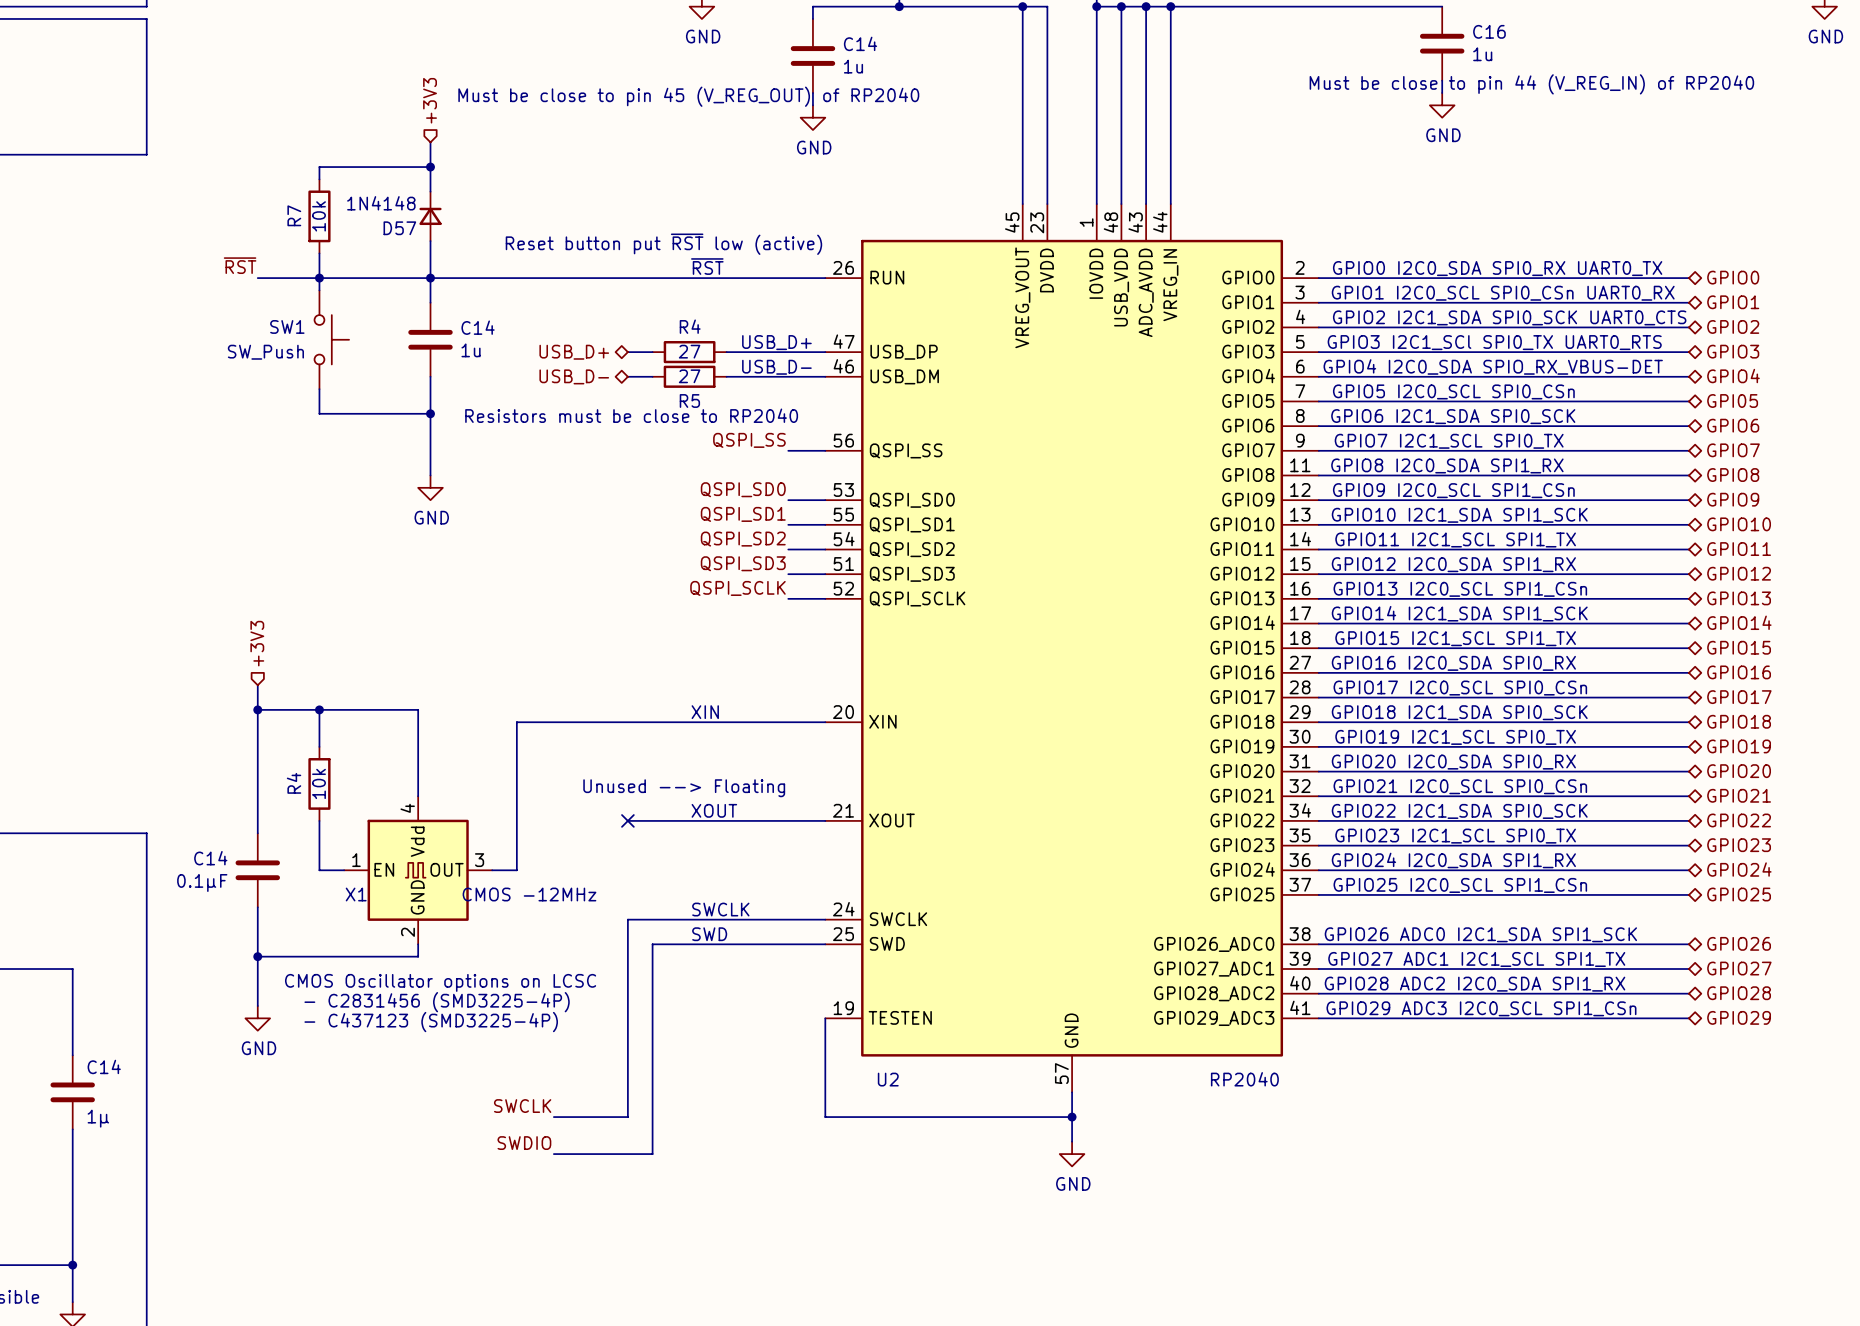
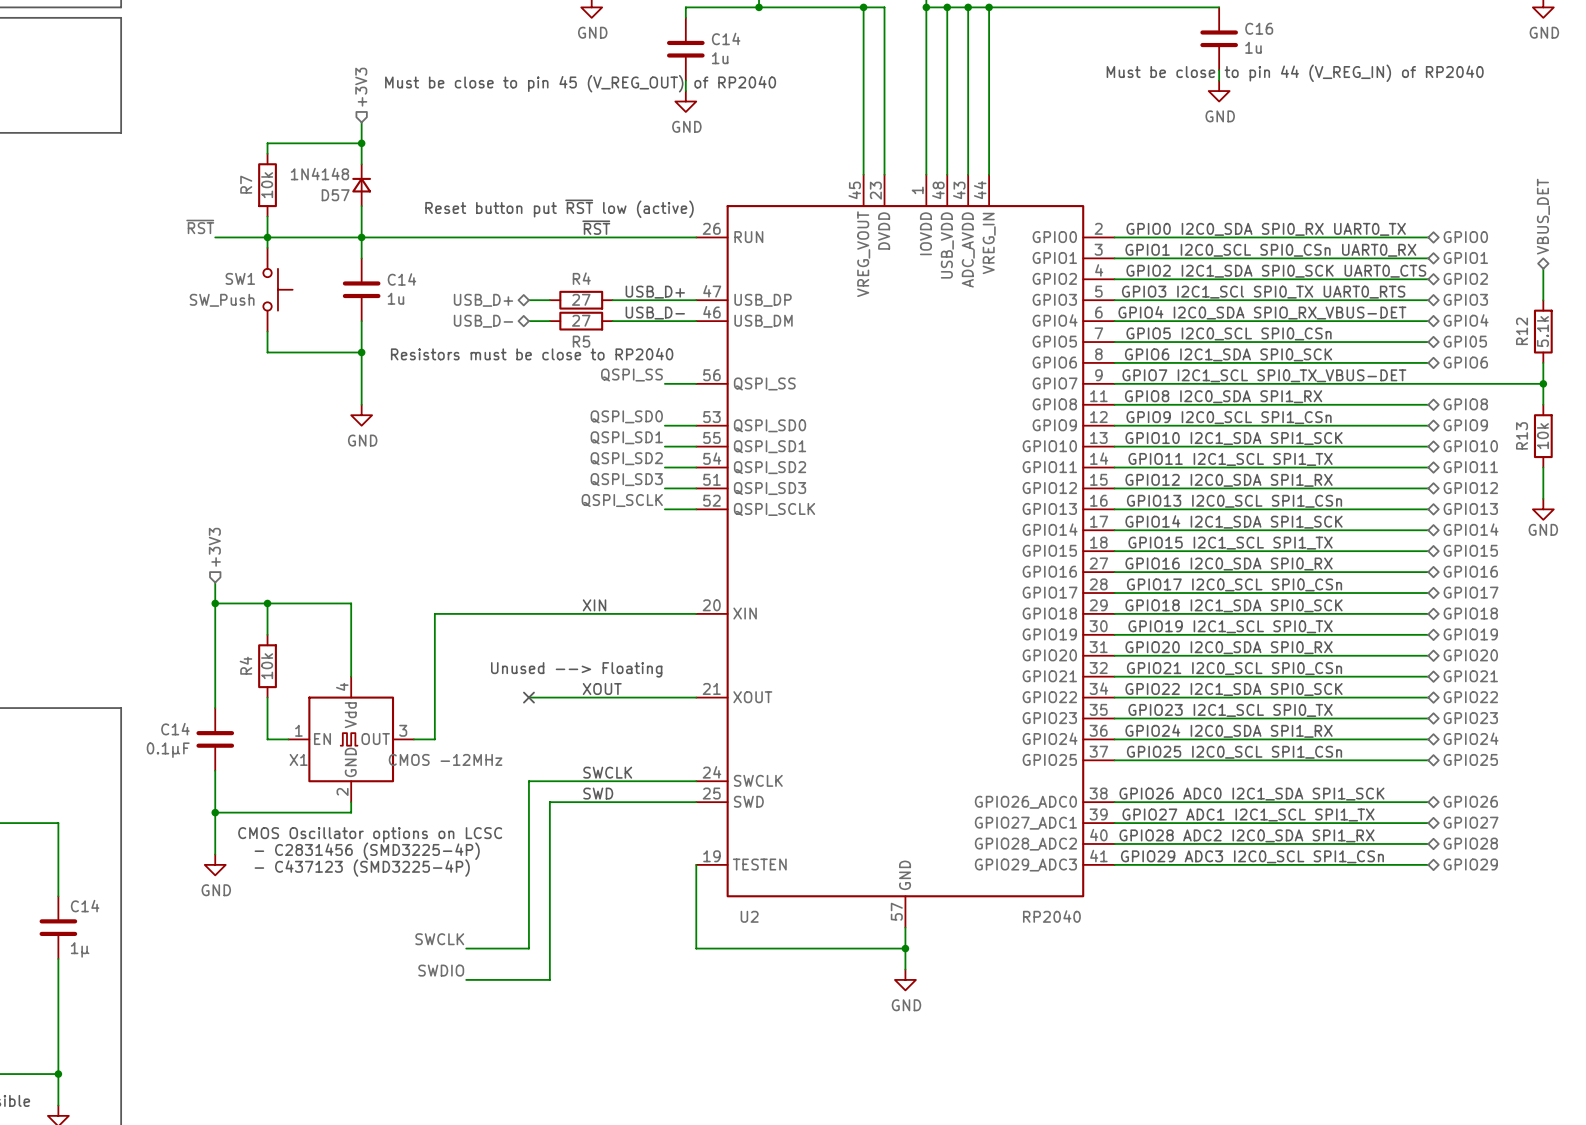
hierarchical label: none -> VBUS_DET (1543, 216)
wire: none -> (1543, 268) (1543, 300)
R12: none -> 5.1k (1543, 331)
wire: none -> (1543, 362) (1543, 404)
text: GPIO7 I2C1_SCL SPI0_TX (1449, 441) -> GPIO7 I2C1_SCL SPI0_TX_VBUS-DET (1264, 375)
wire: none -> (1428, 383) (1543, 383)
hierarchical label: GPIO7 (1733, 450) -> none
junction: none -> (1543, 383)
R13: none -> 10k (1543, 436)
wire: none -> (1543, 467) (1543, 498)
power symbol: none -> GND (1543, 509)

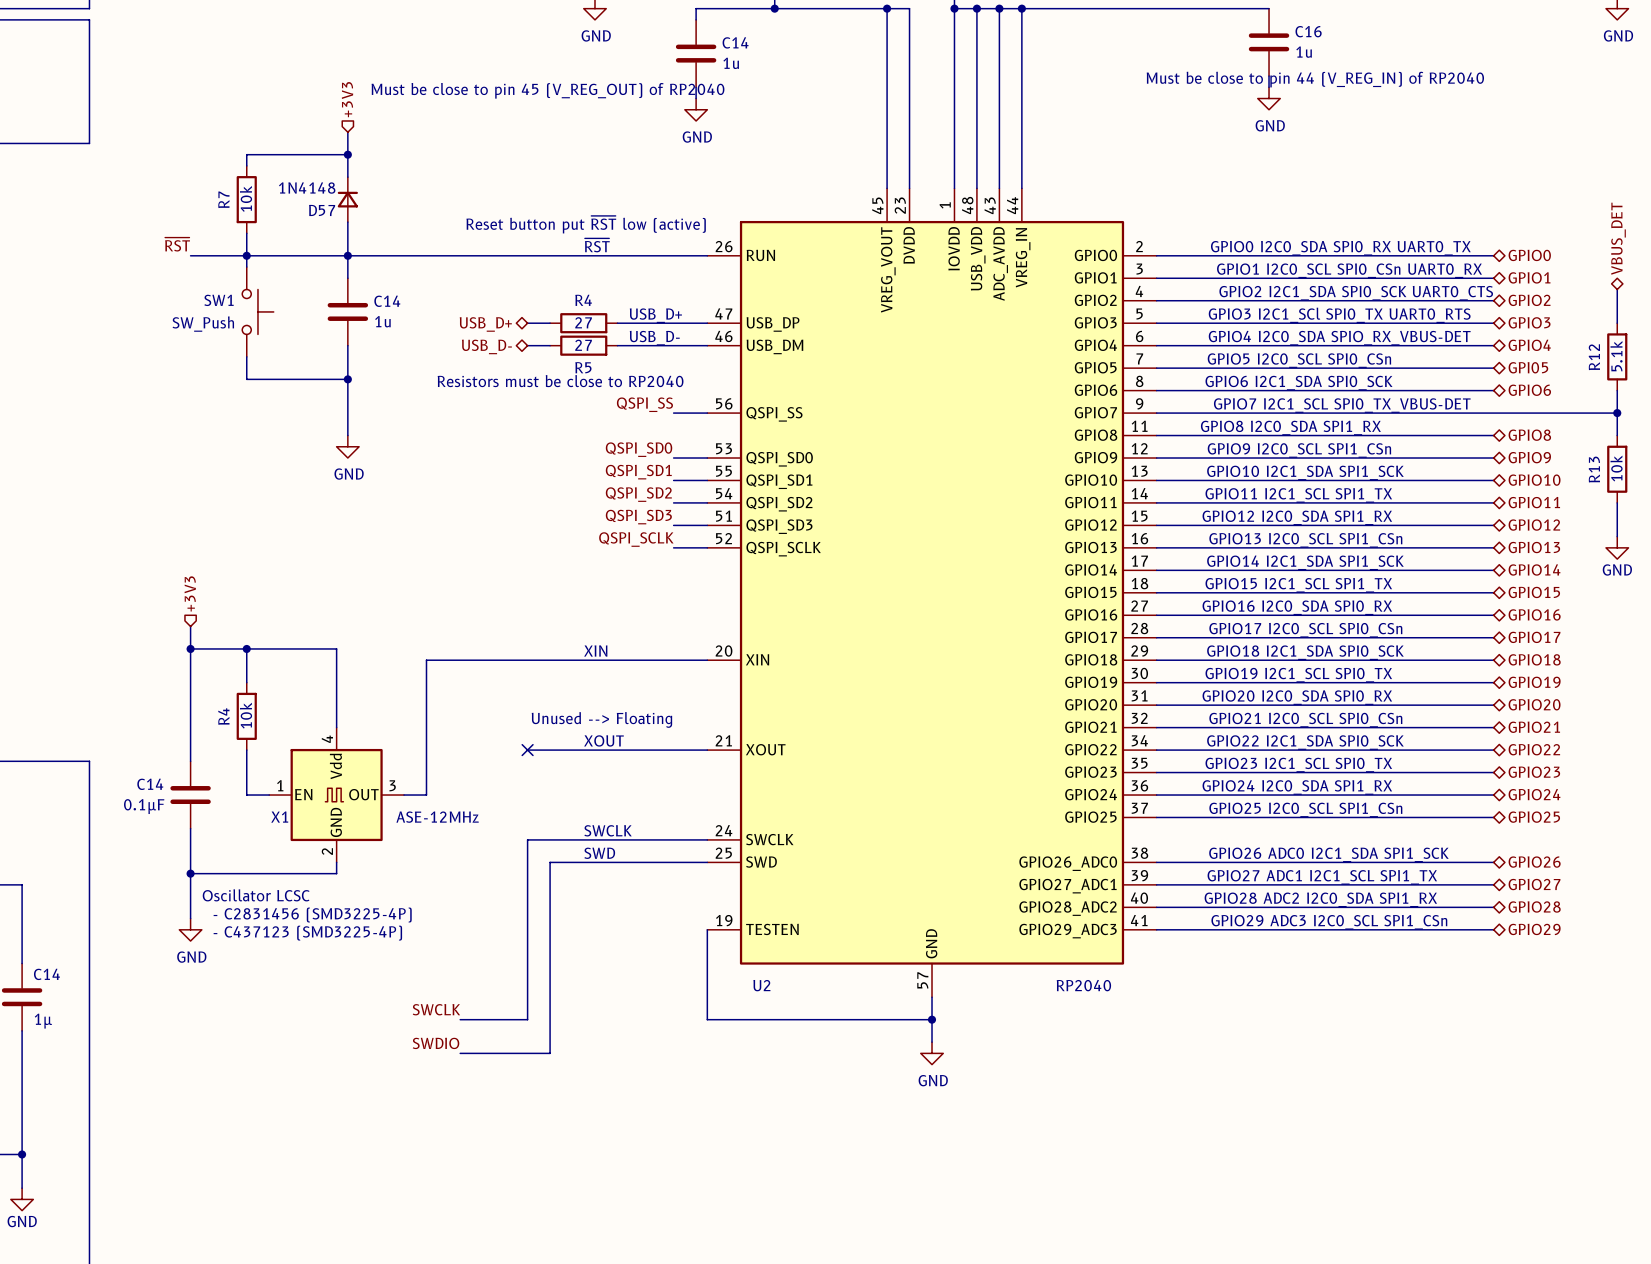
X1 value: CMOS -12MHz (445, 759) -> ASE-12MHz (437, 817)
text: CMOS Oscillator options on LCSC (370, 834) -> Oscillator LCSC (256, 895)
text position: - C2831456 (SMD3225-4P) (367, 851) -> - C2831456 (SMD3225-4P) (312, 915)
text position: - C437123 (SMD3225-4P) (362, 868) -> - C437123 (SMD3225-4P) (307, 933)

